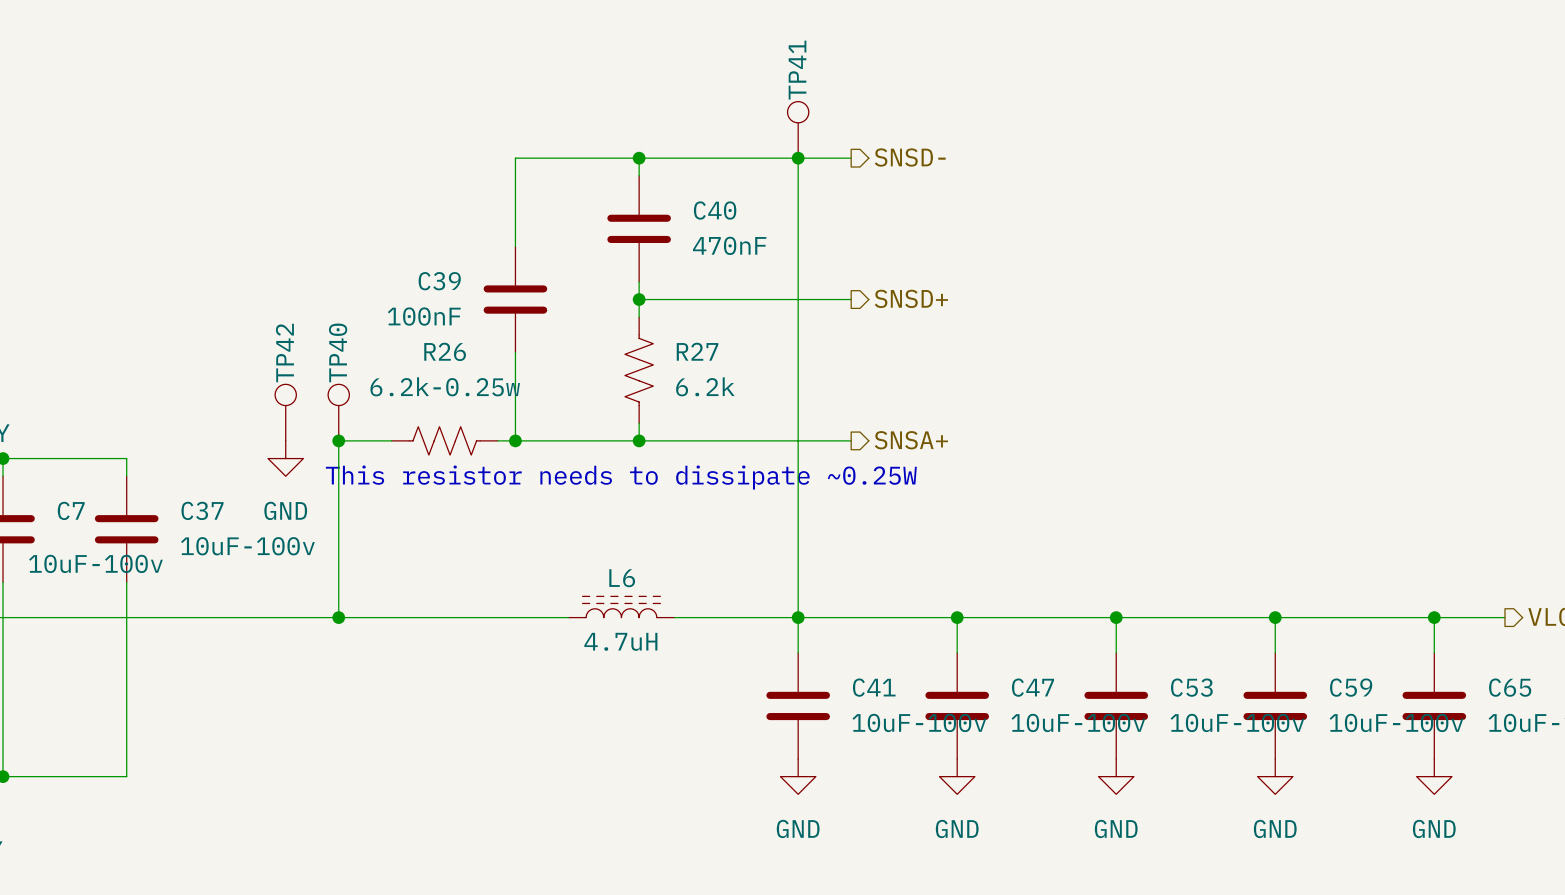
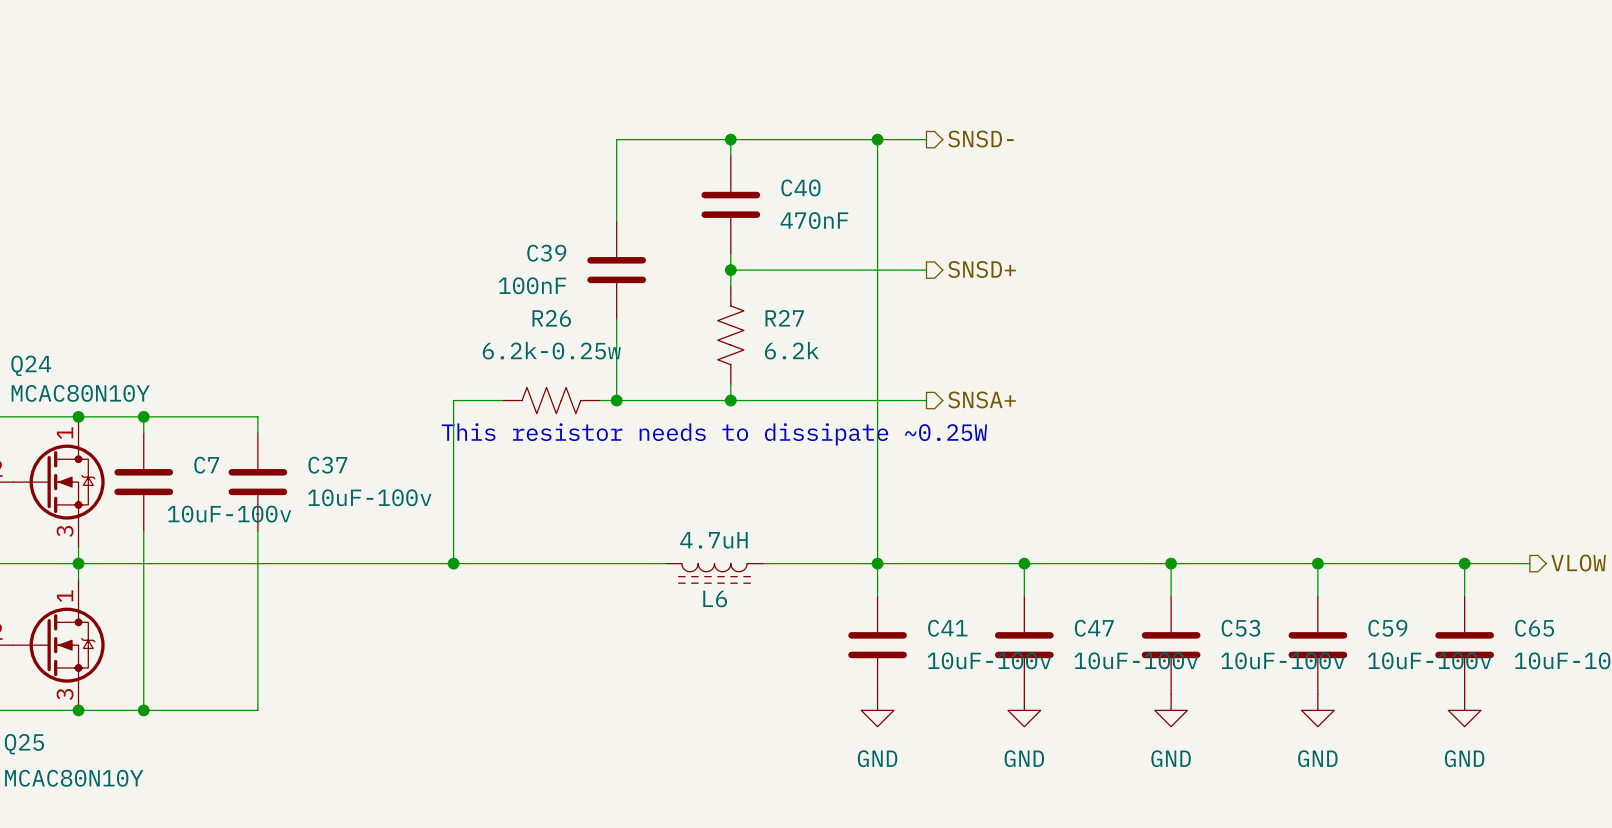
TP41: (798, 129) -> none
TP42: (285, 412) -> none
TP40: (338, 412) -> none
junction: (338, 440) -> none
power symbol: GND (285, 458) -> none
L6 rotation: 0° (621, 606) -> 180° (714, 573)

